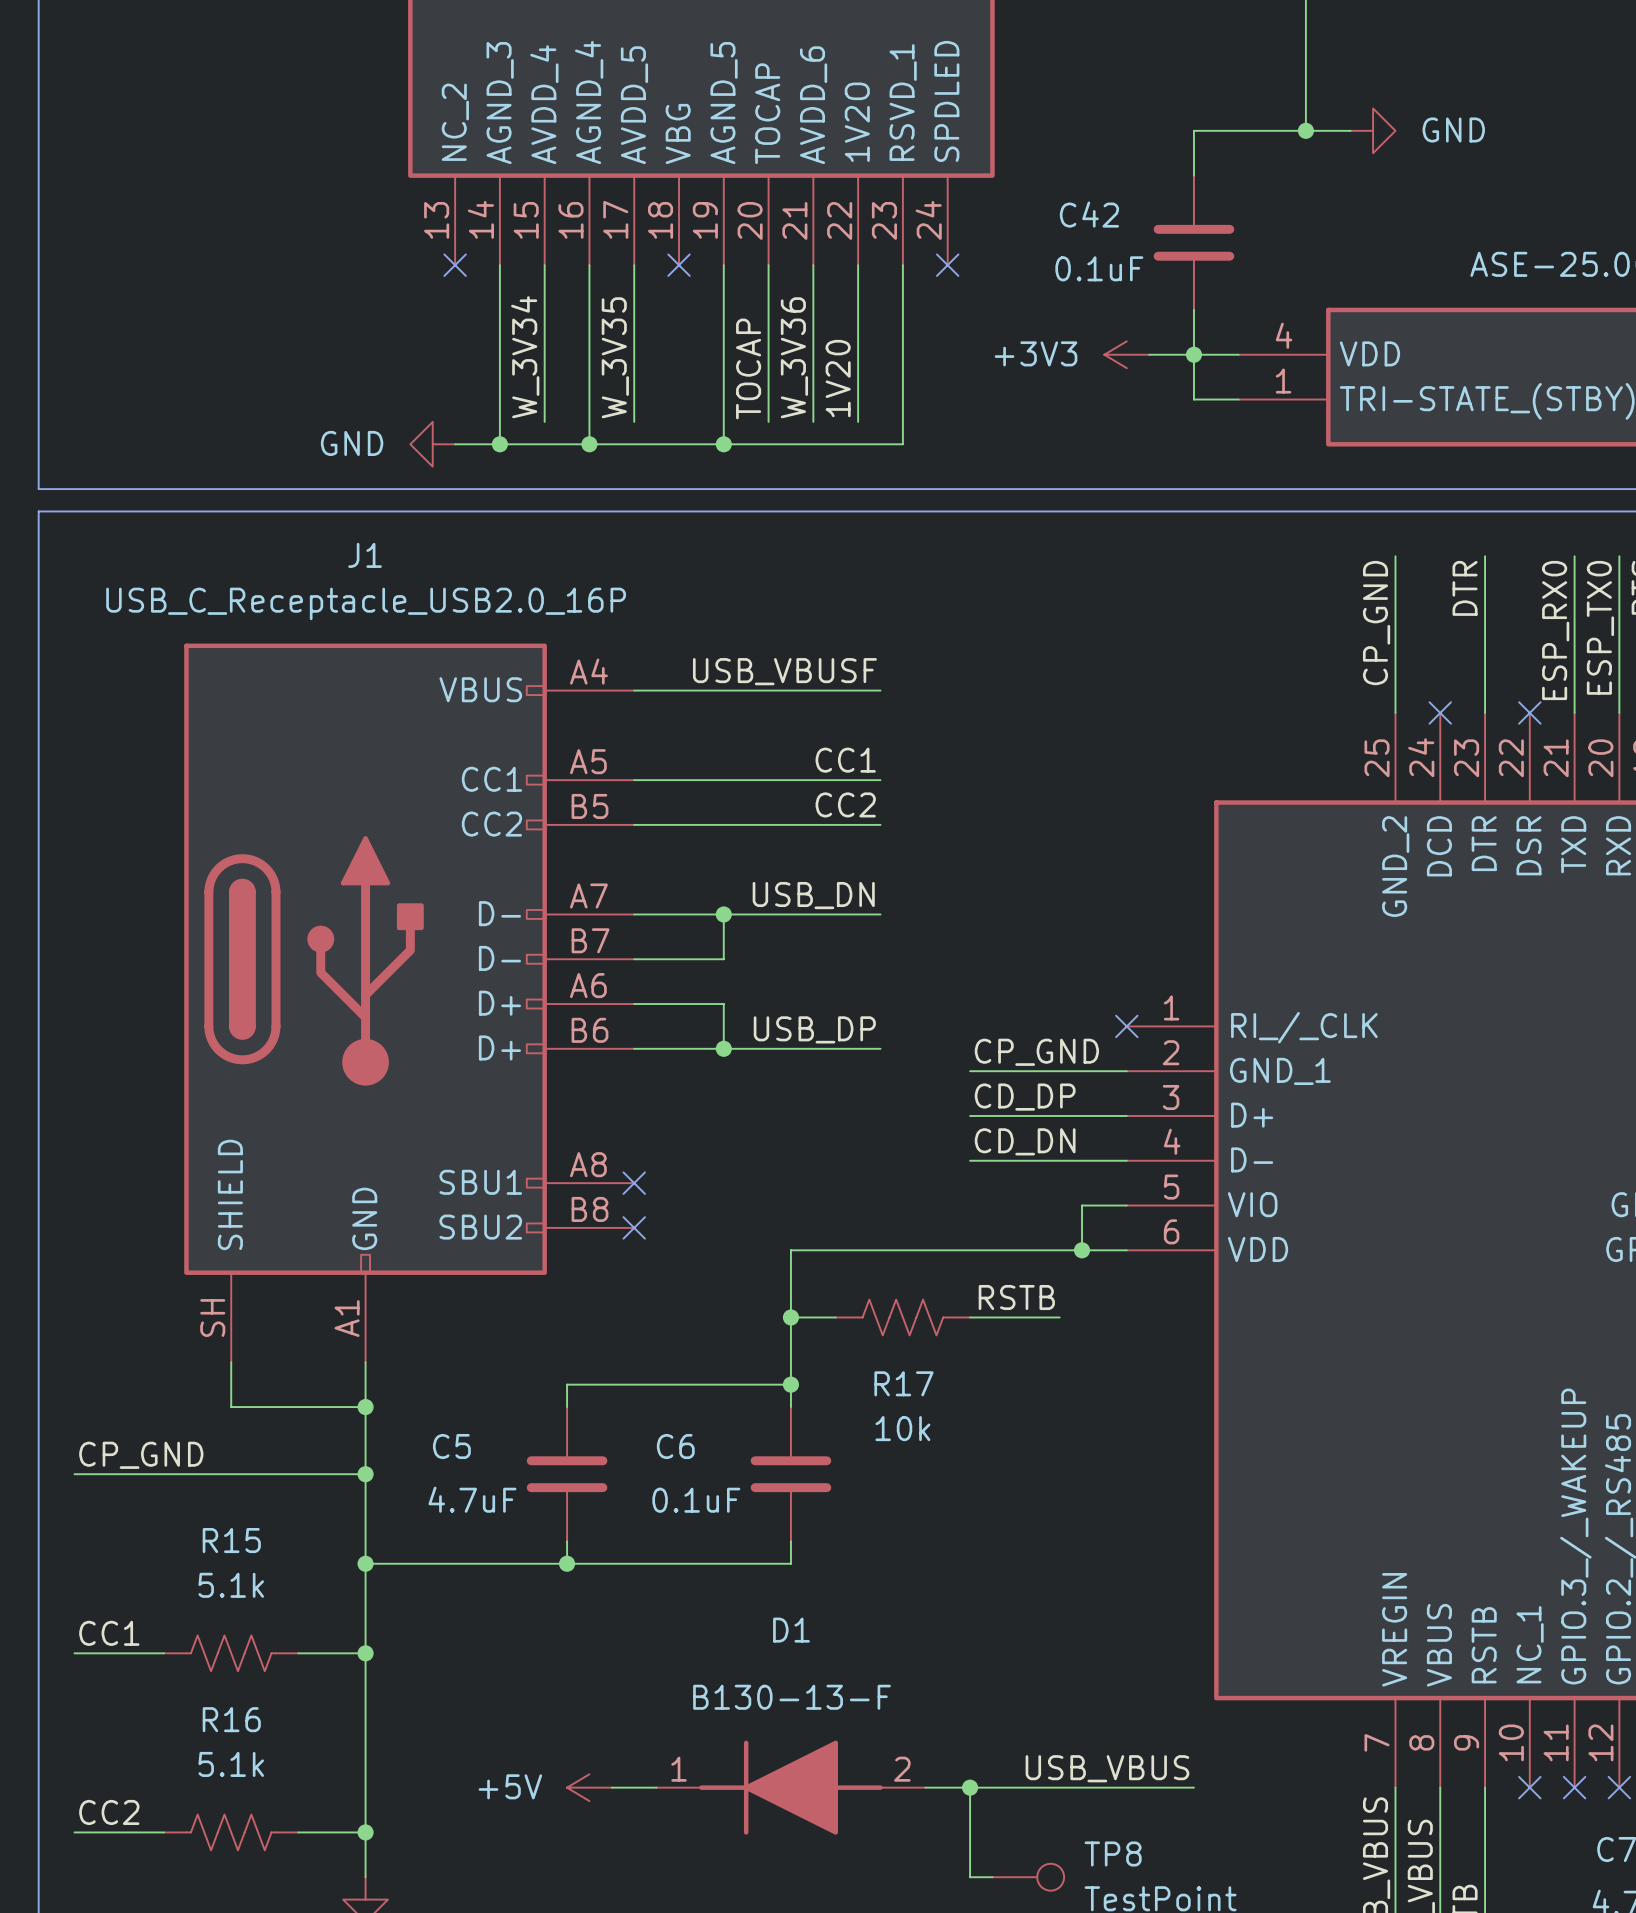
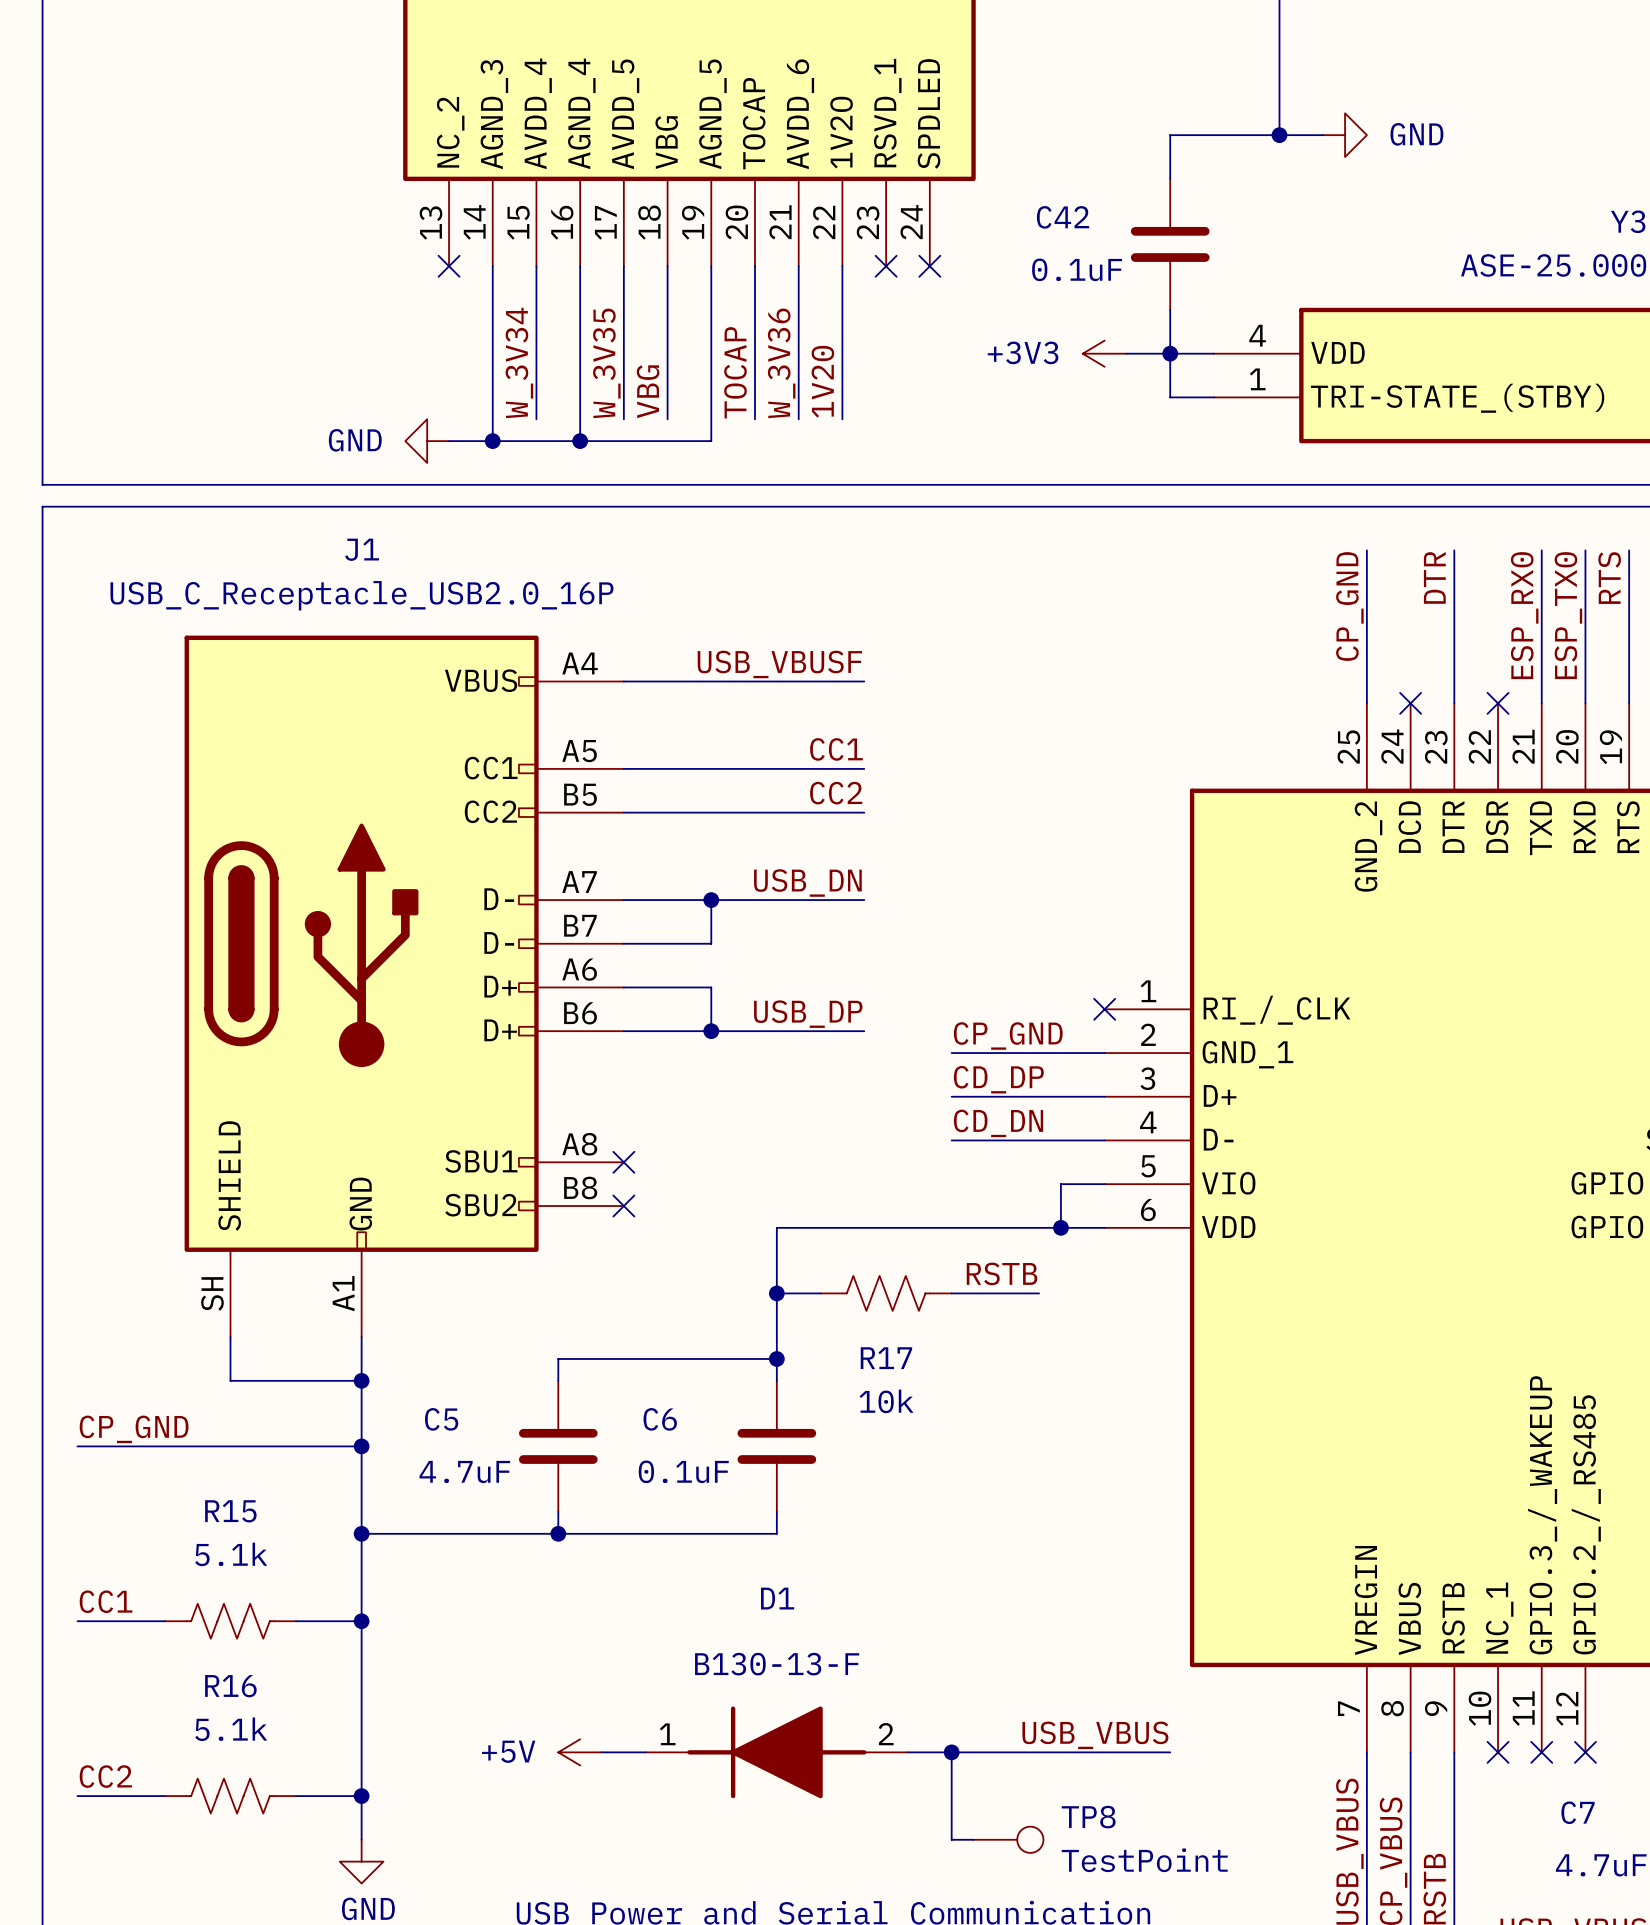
wire: none -> (667, 266) (667, 419)
no-connect mark: (679, 265) -> none
wire: (902, 265) (902, 444) (723, 444) -> none
no-connect mark: none -> (886, 266)
label: none -> VBG (648, 391)
junction: (723, 444) -> none

